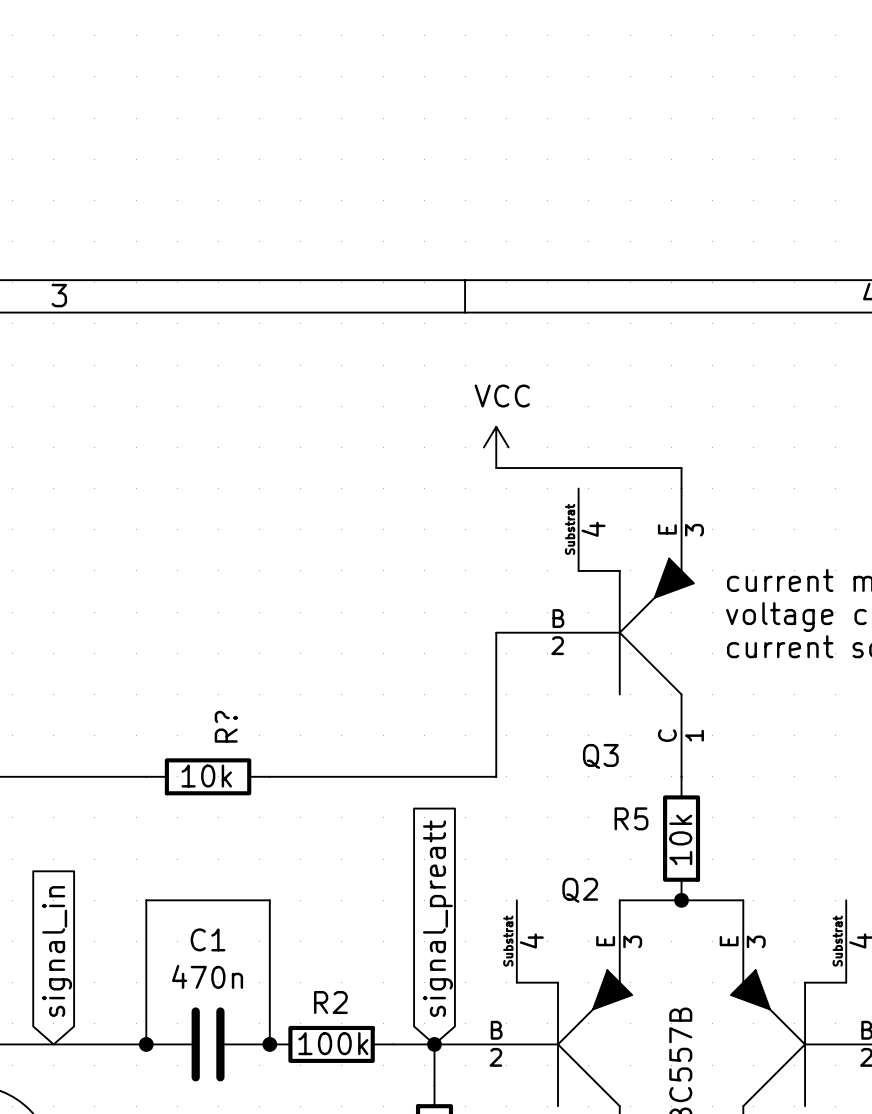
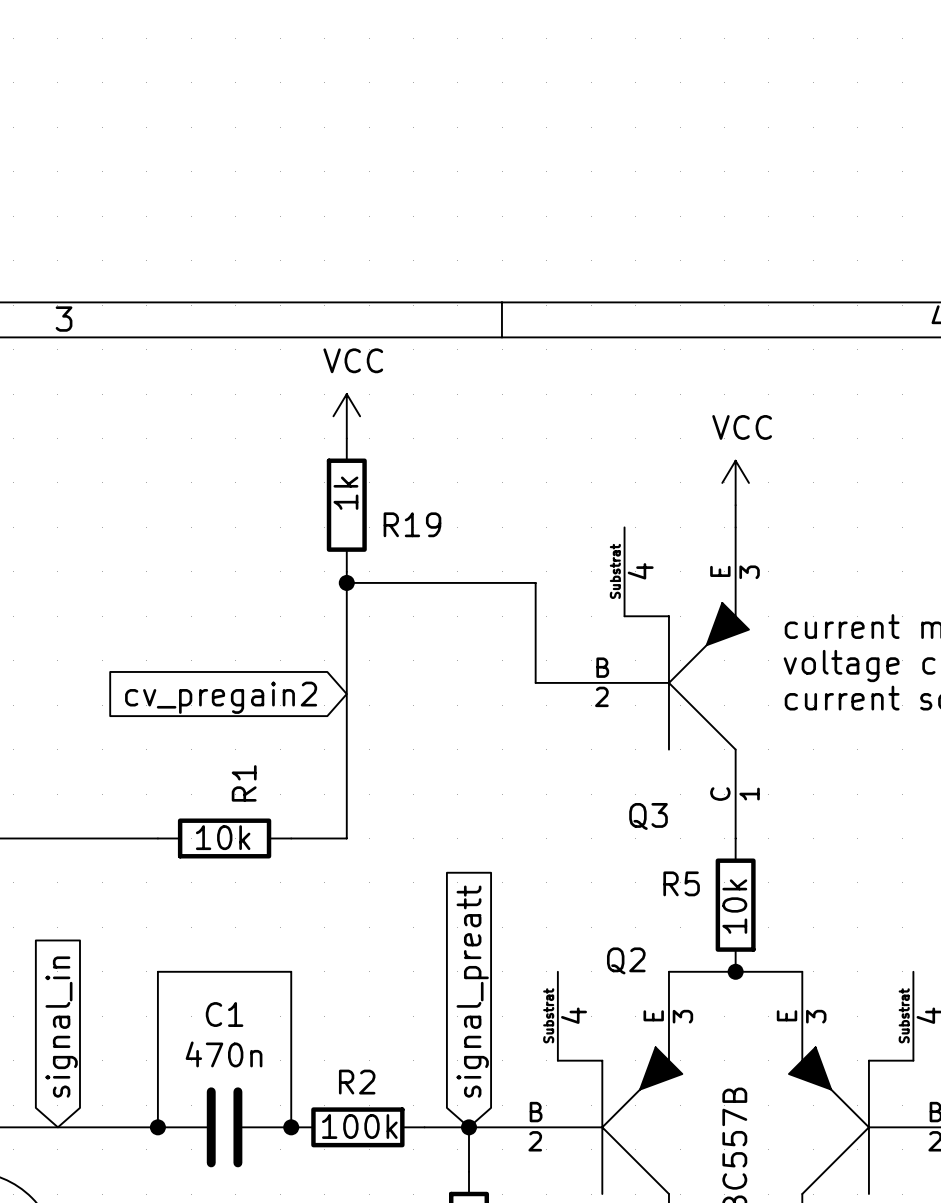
power symbol: none -> VCC (346, 416)
power symbol: VCC (496, 447) -> none
power symbol: none -> VCC (735, 482)
R19: none -> 1k (346, 505)
wire: (496, 468) (681, 468) -> none
wire: none -> (346, 582) (535, 582) (535, 682)
junction: none -> (346, 582)
wire: (496, 632) (496, 776) (321, 776) -> (346, 571) (346, 838)
global label: none -> cv_pregain2 (221, 697)
R? name: R? (226, 726) -> R1 (244, 783)

